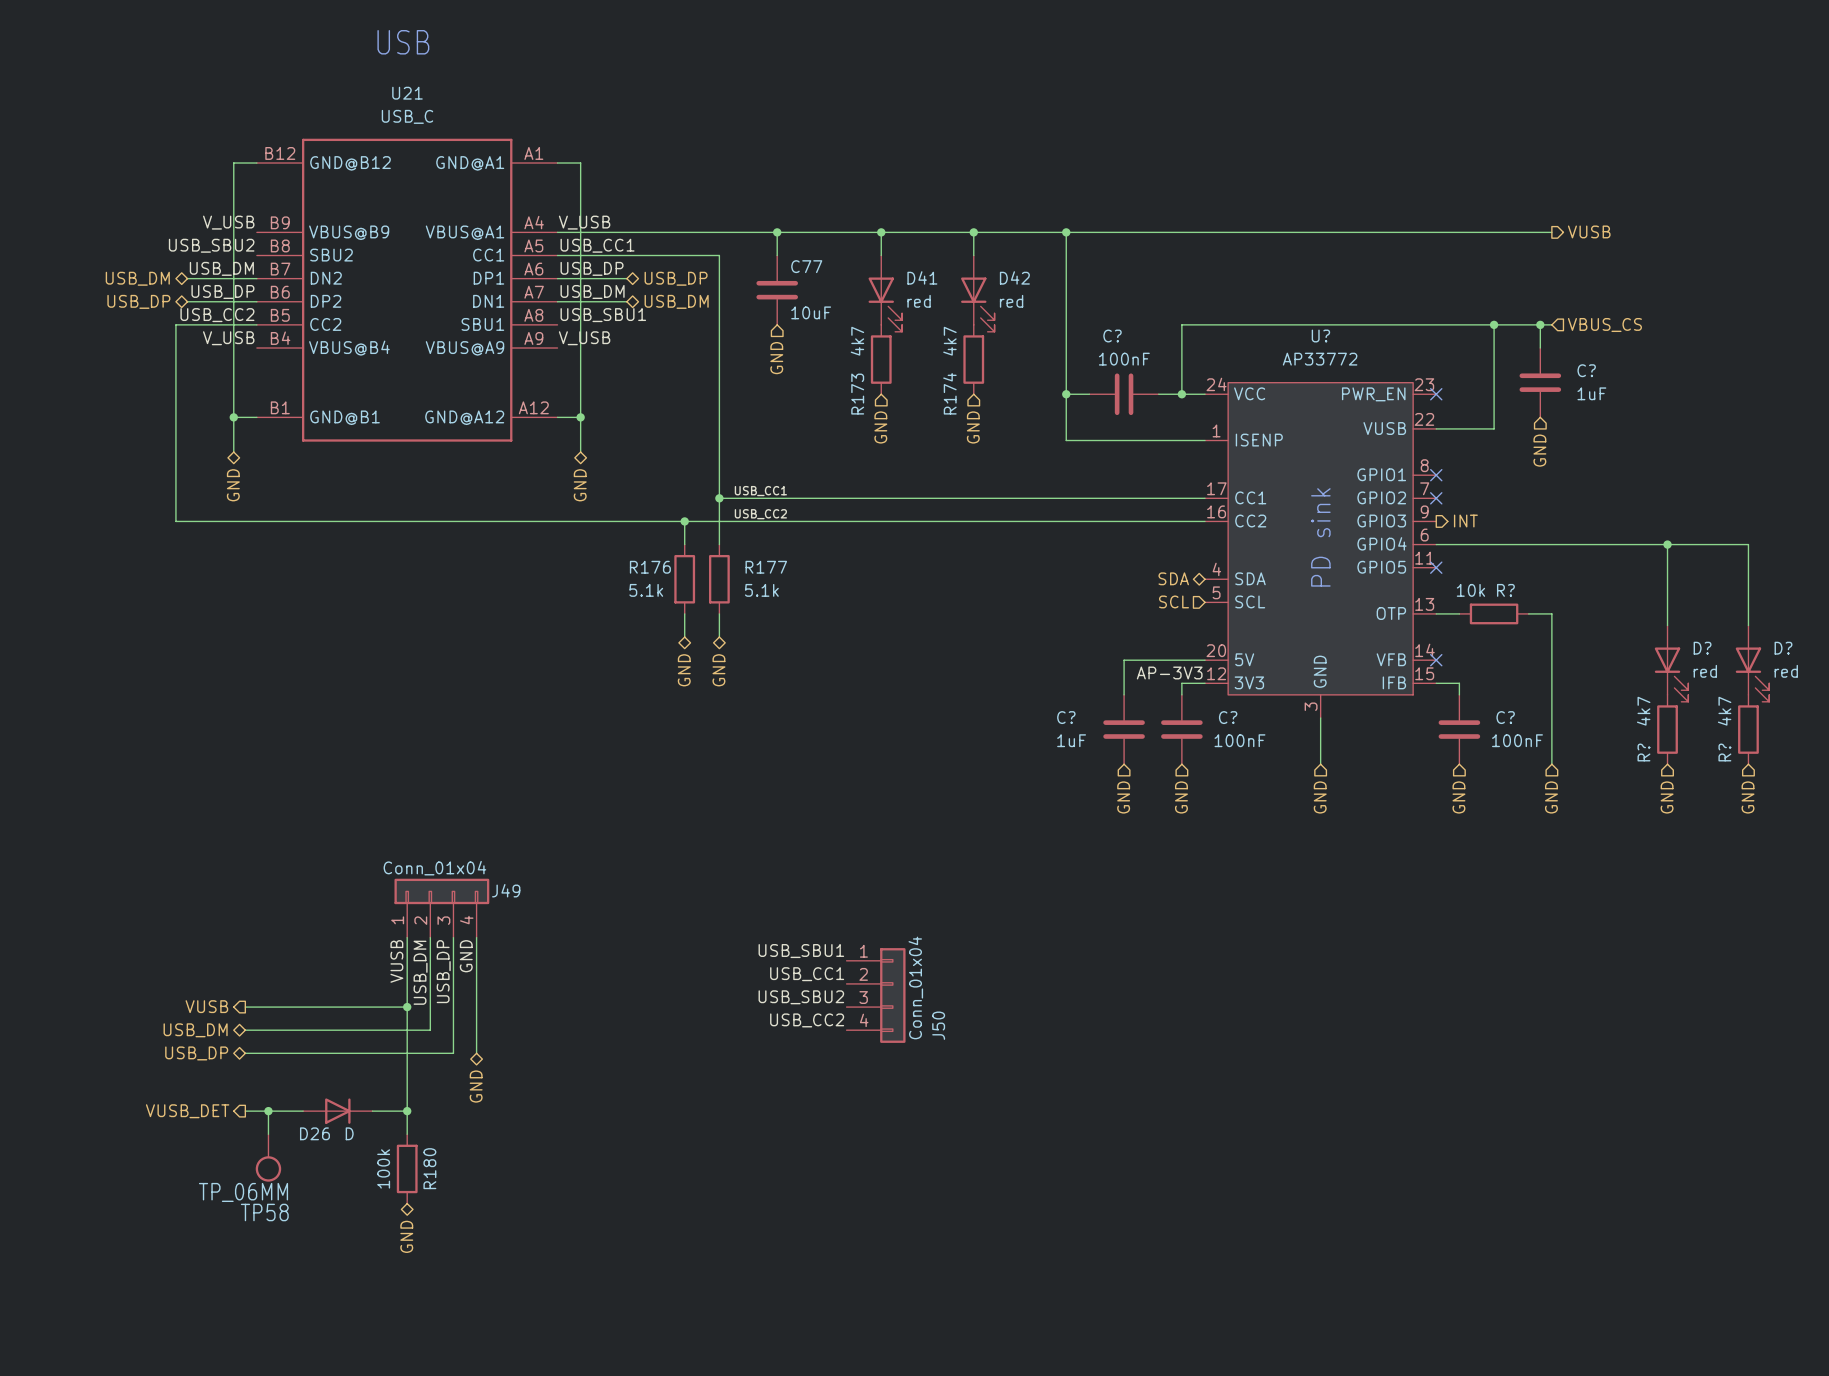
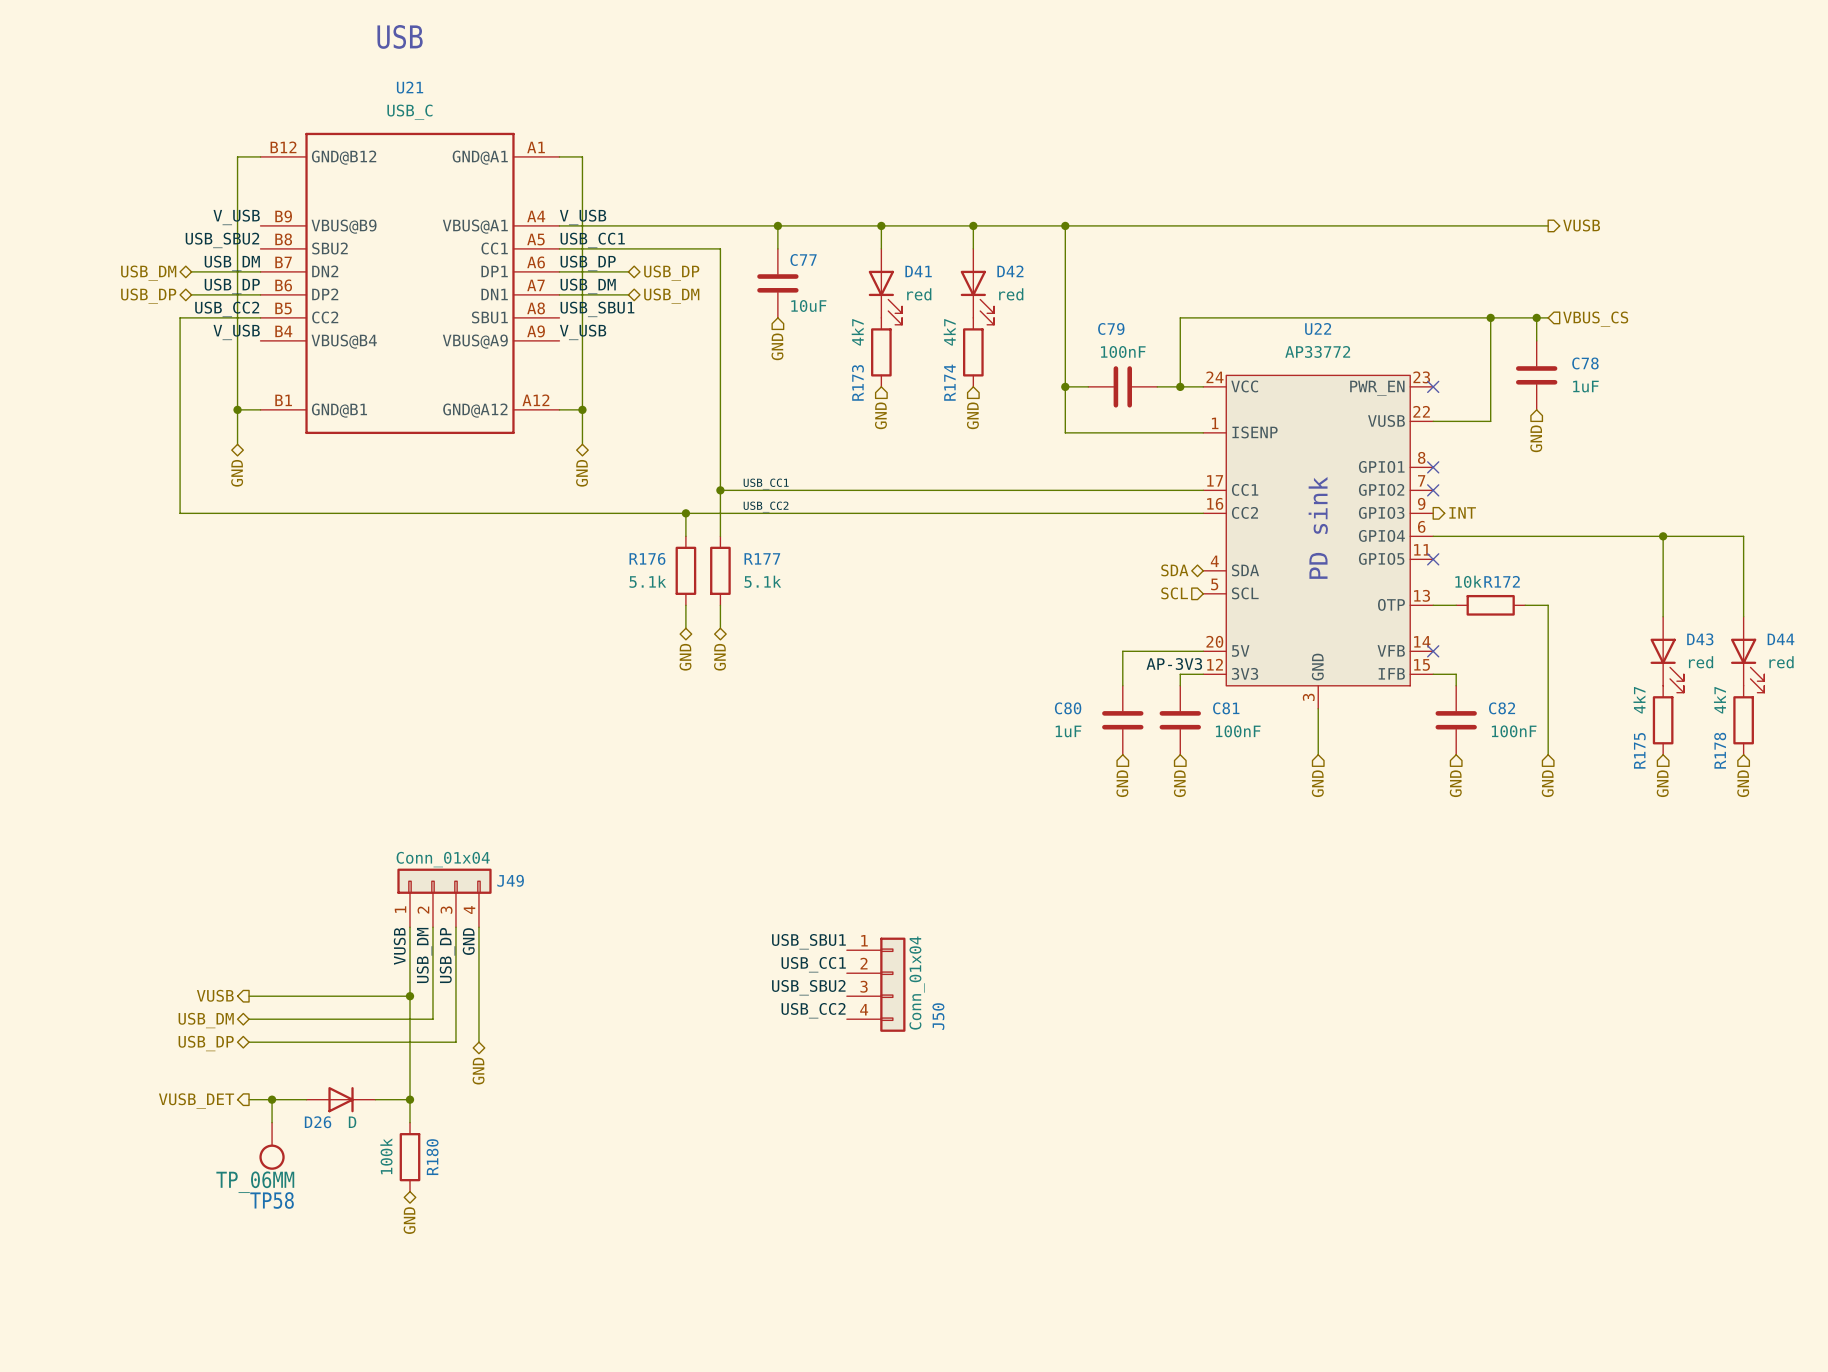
C? name: C? (1112, 336) -> C79 (1111, 328)
U? name: U? (1320, 336) -> U22 (1318, 328)
C? name: C? (1586, 370) -> C78 (1585, 363)
R? name: R? (1505, 590) -> R172 (1502, 581)
D? name: D? (1702, 648) -> D43 (1700, 639)
D? name: D? (1783, 648) -> D44 (1781, 639)
C? name: C? (1066, 717) -> C80 (1068, 708)
C? name: C? (1228, 717) -> C81 (1226, 708)
C? name: C? (1505, 717) -> C82 (1502, 708)
R? name: R? (1643, 752) -> R175 (1639, 750)
R? name: R? (1724, 752) -> R178 (1720, 750)

